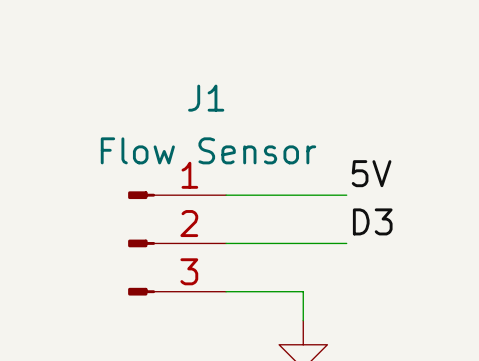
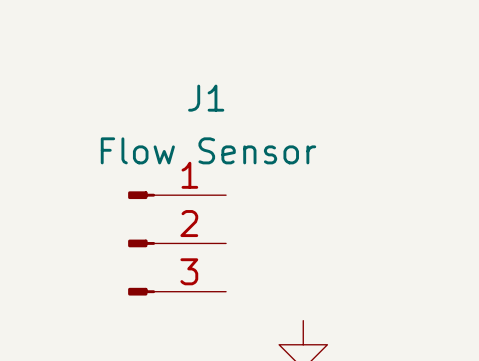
label: 5V (371, 173) -> none
wire: (226, 195) (346, 195) -> none
label: D3 (372, 221) -> none
wire: (226, 243) (346, 243) -> none
wire: (226, 291) (303, 291) (303, 320) -> none

